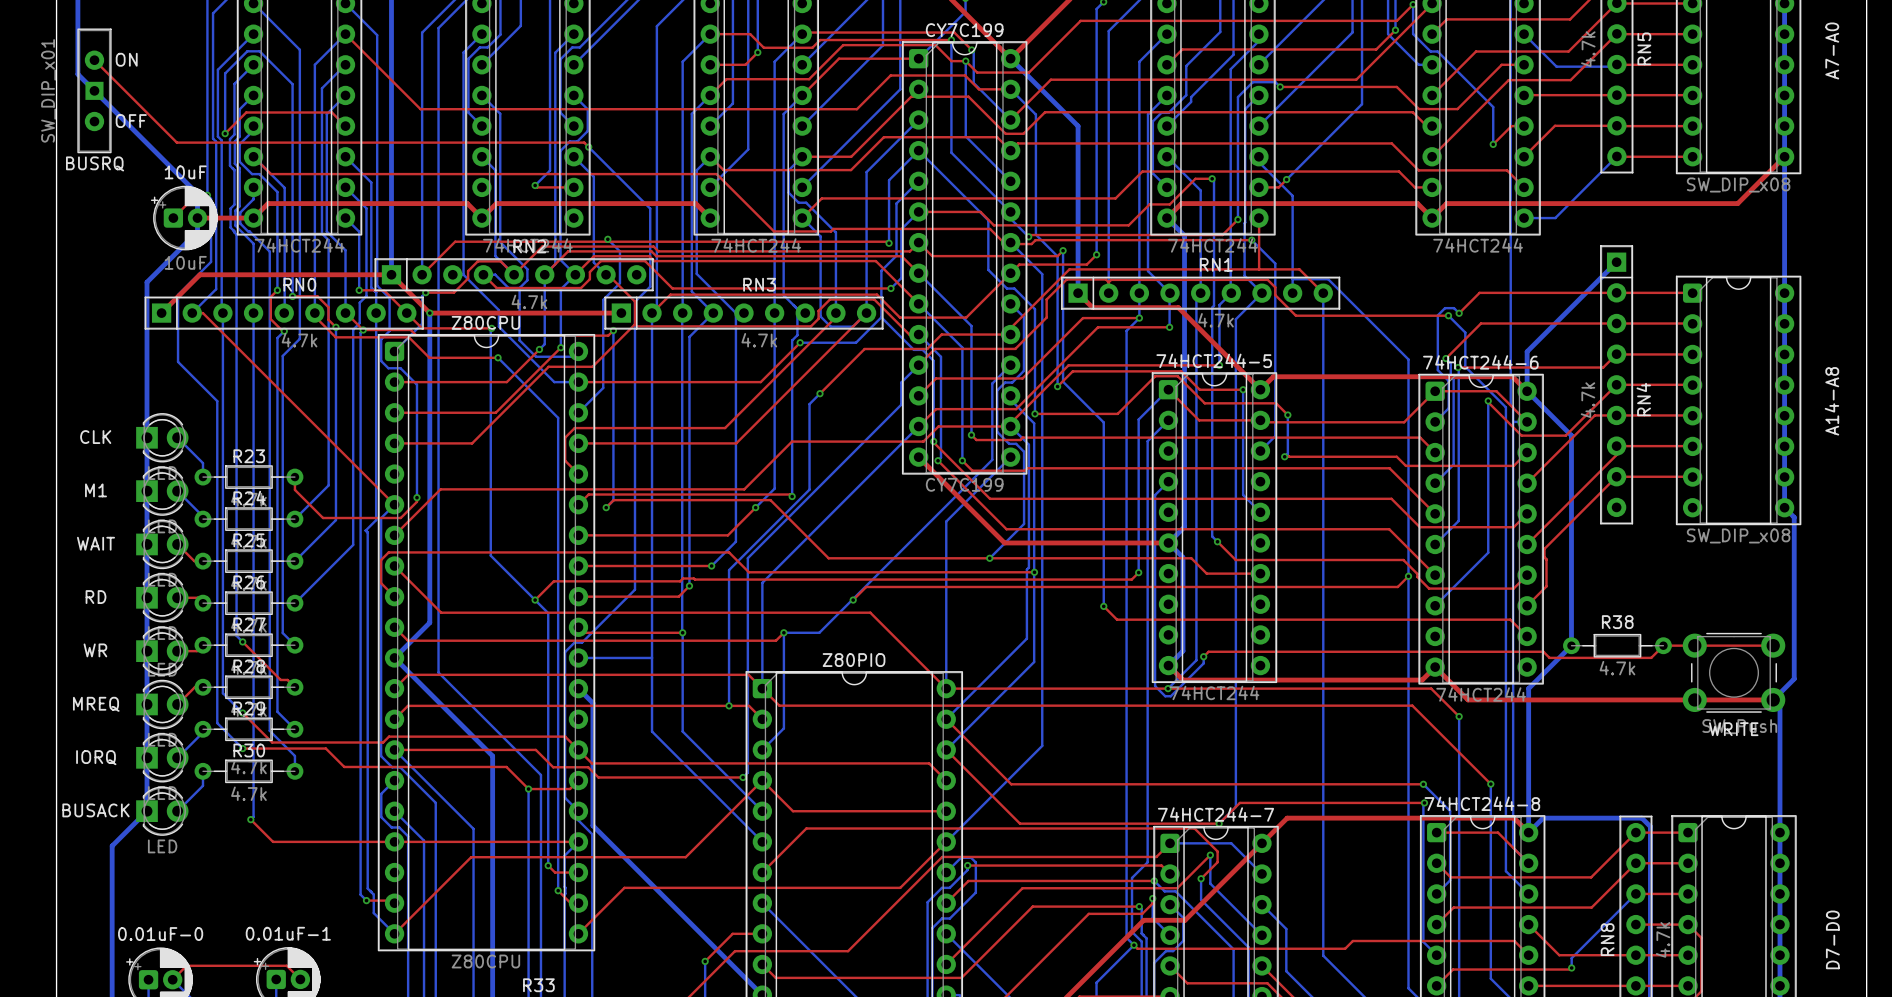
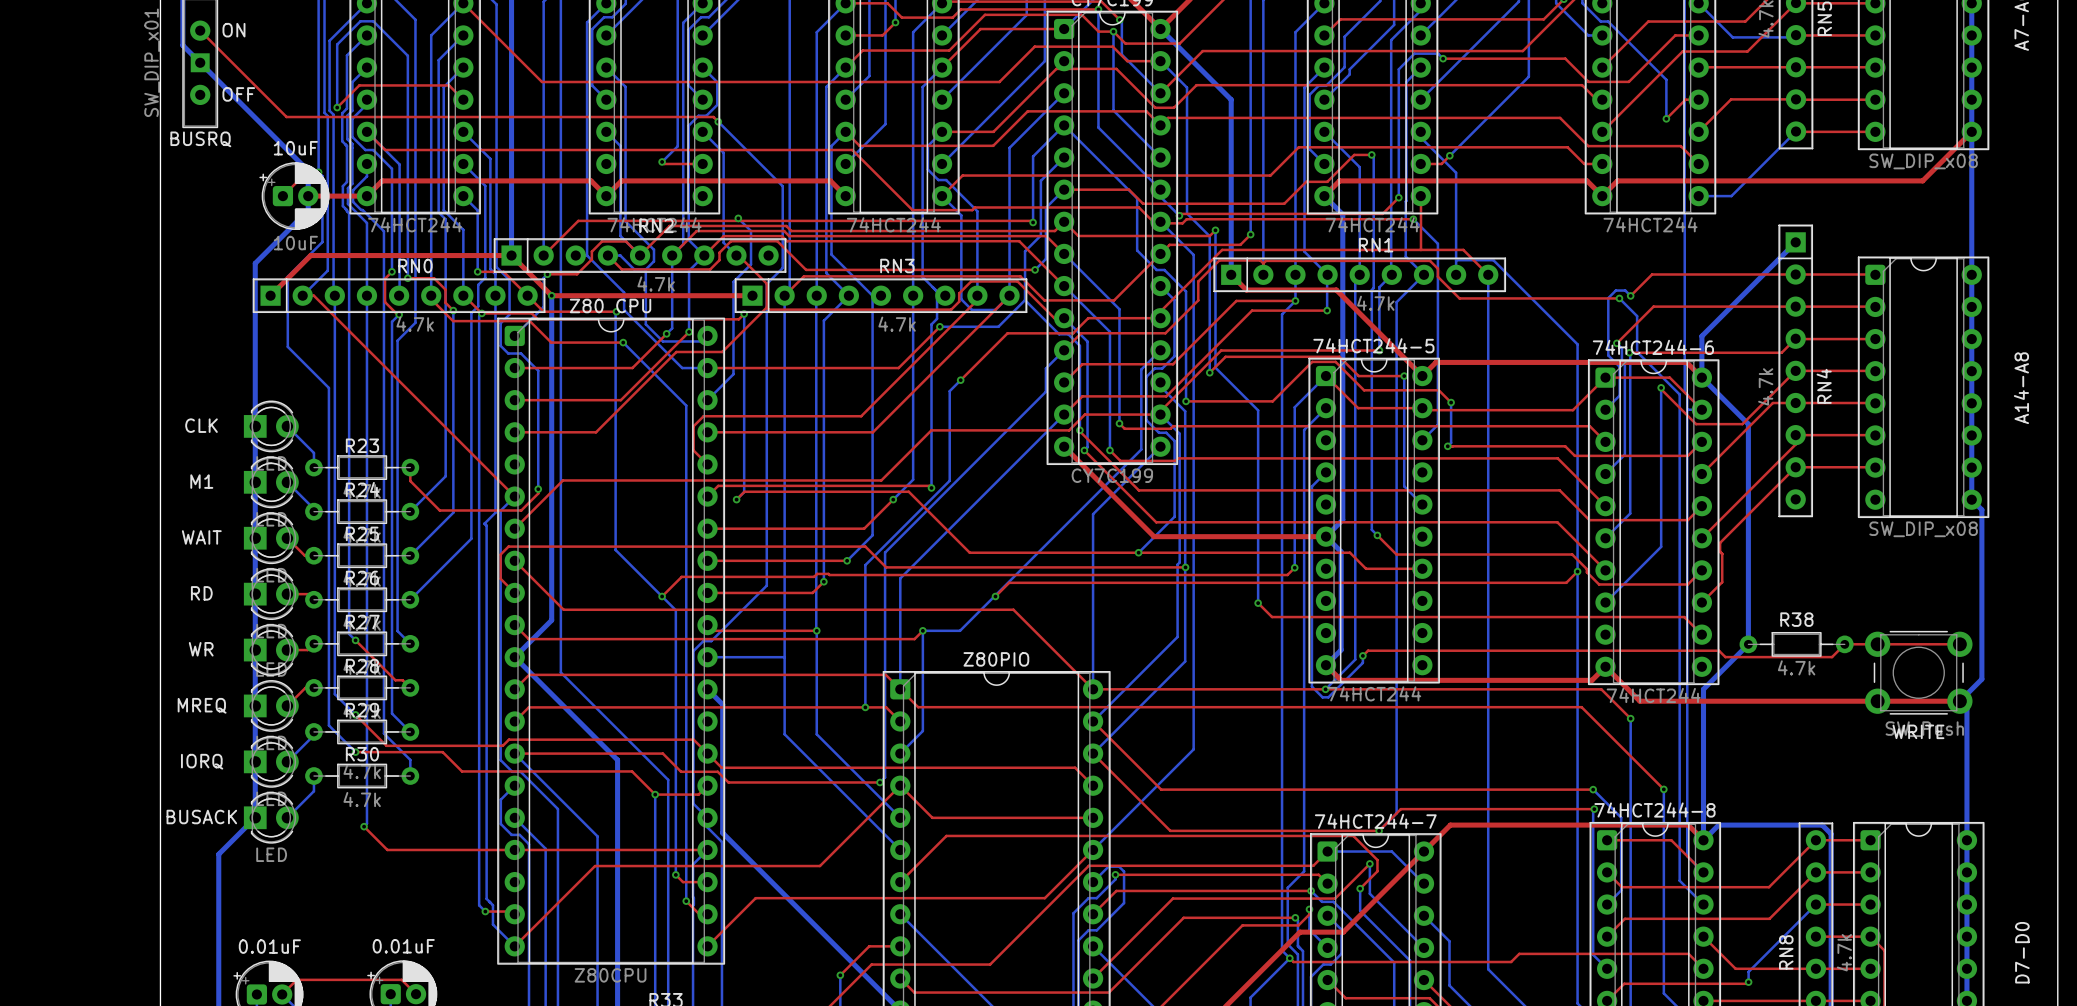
Z80CPU name: Z80CPU (485, 322) -> Z80 CPU (610, 305)
0.01uF-1 name: 0.01uF-1 (288, 933) -> 0.01uF (403, 946)
0.01uF-0 name: 0.01uF-0 (160, 934) -> 0.01uF (269, 946)

